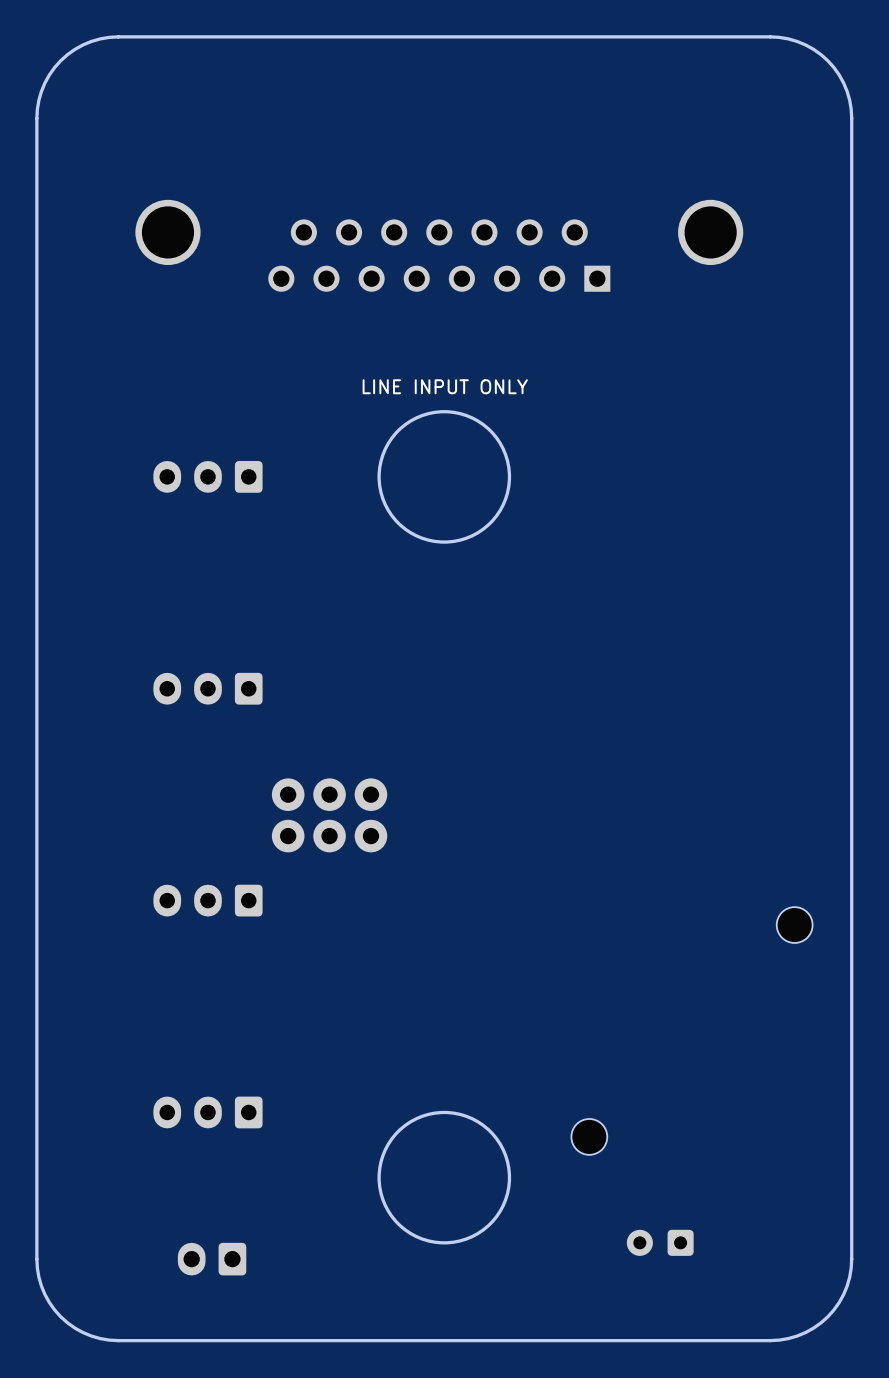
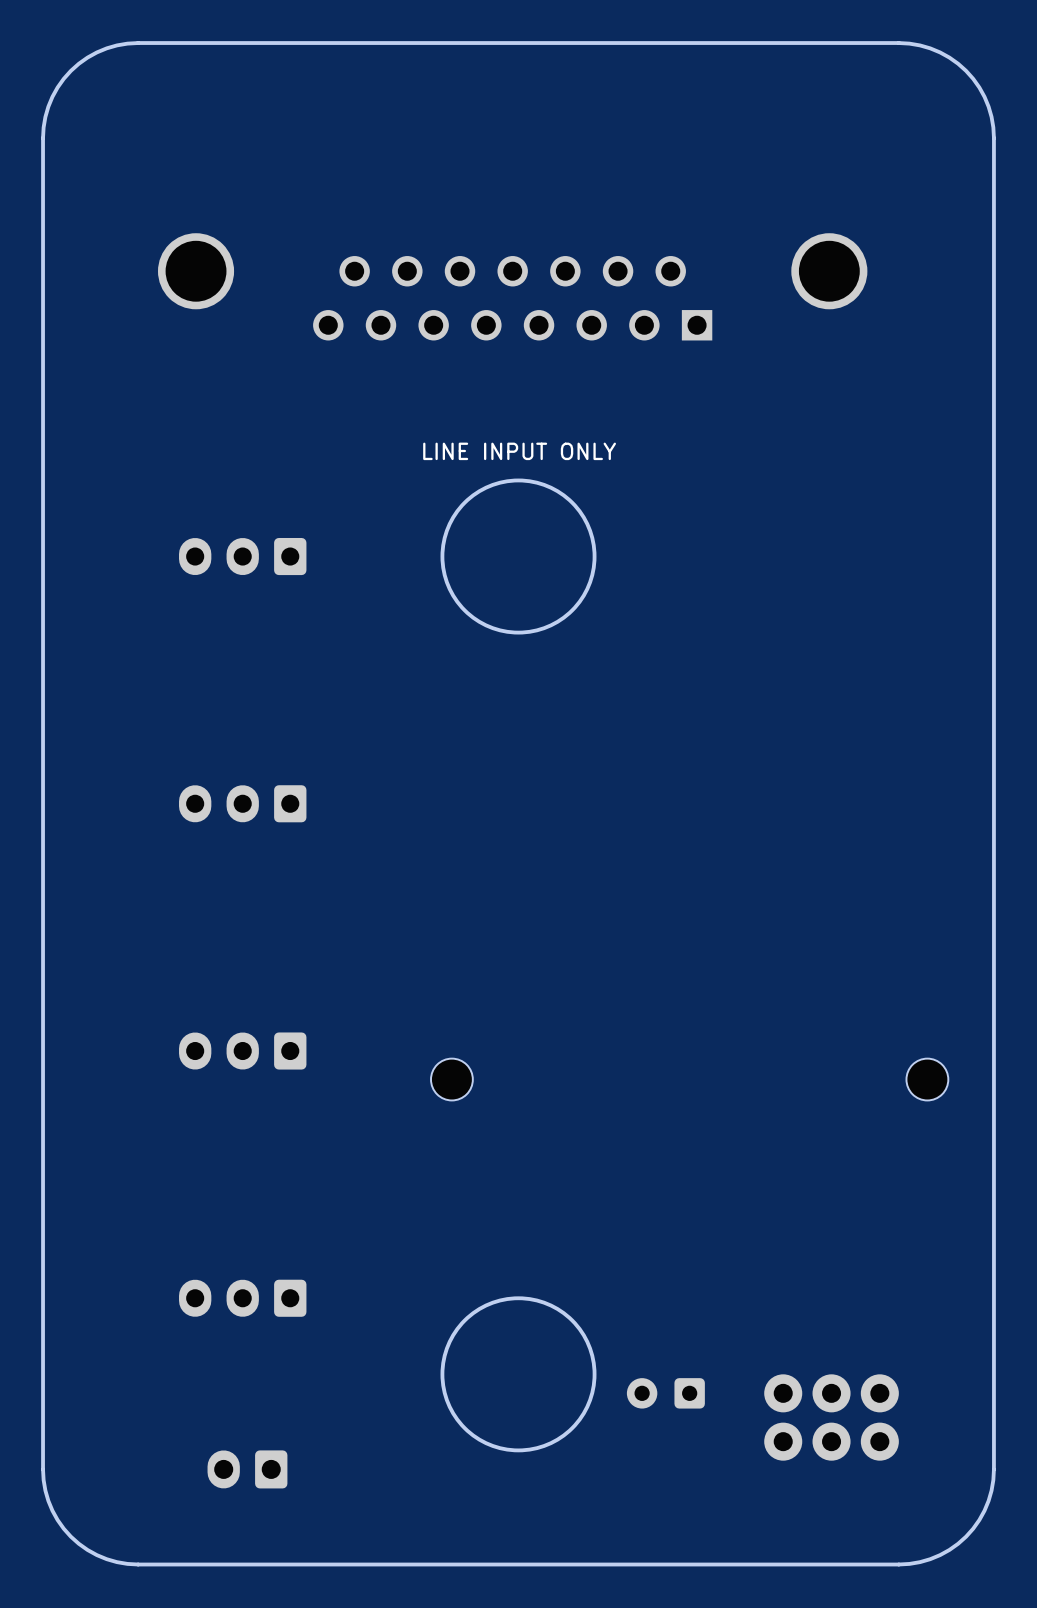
part: (329, 815) -> none
part position: (589, 1136) -> (451, 1079)
part: none -> (831, 1417)
part position: (660, 1242) -> (665, 1393)

